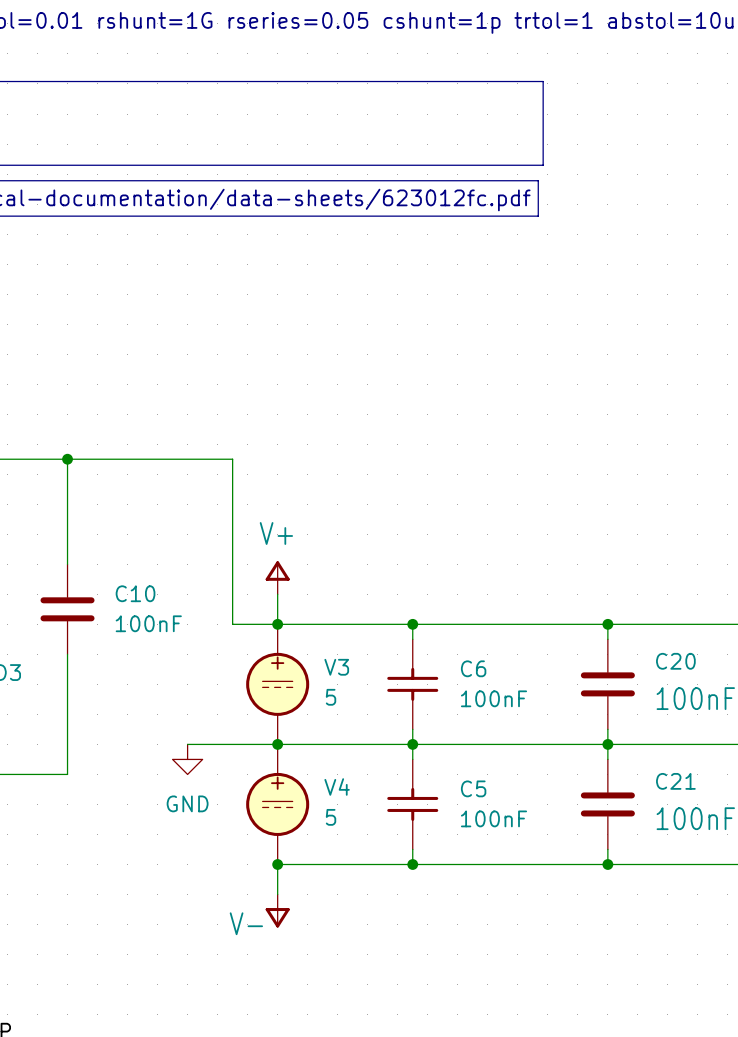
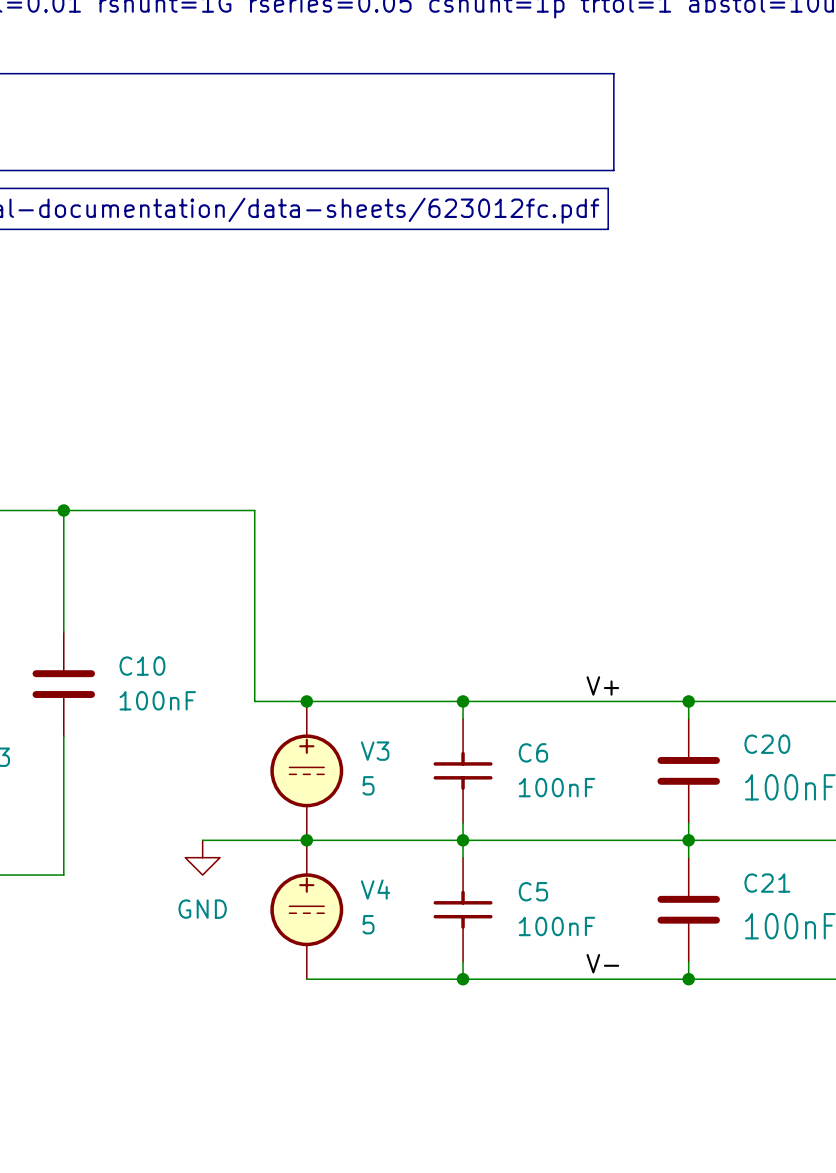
power symbol: V+ (277, 577) -> none
wire: (277, 594) (277, 624) -> none
label: none -> V+ (602, 685)
label: none -> V- (602, 963)
wire: (277, 864) (277, 894) -> none
junction: (277, 864) -> none
power symbol: V- (277, 911) -> none

